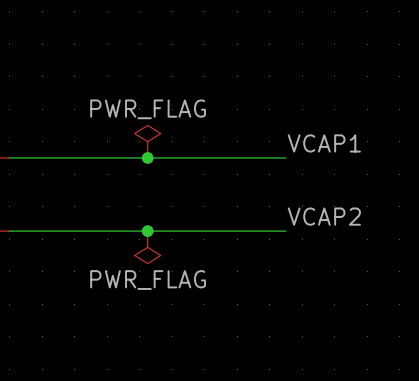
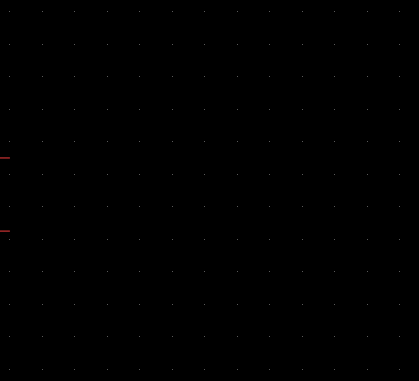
power symbol: PWR_FLAG (147, 141) -> none
label: VCAP1 (324, 143) -> none
wire: (9, 157) (285, 157) -> none
junction: (147, 157) -> none
label: VCAP2 (324, 216) -> none
wire: (9, 231) (285, 231) -> none
junction: (147, 231) -> none
power symbol: PWR_FLAG (147, 247) -> none

